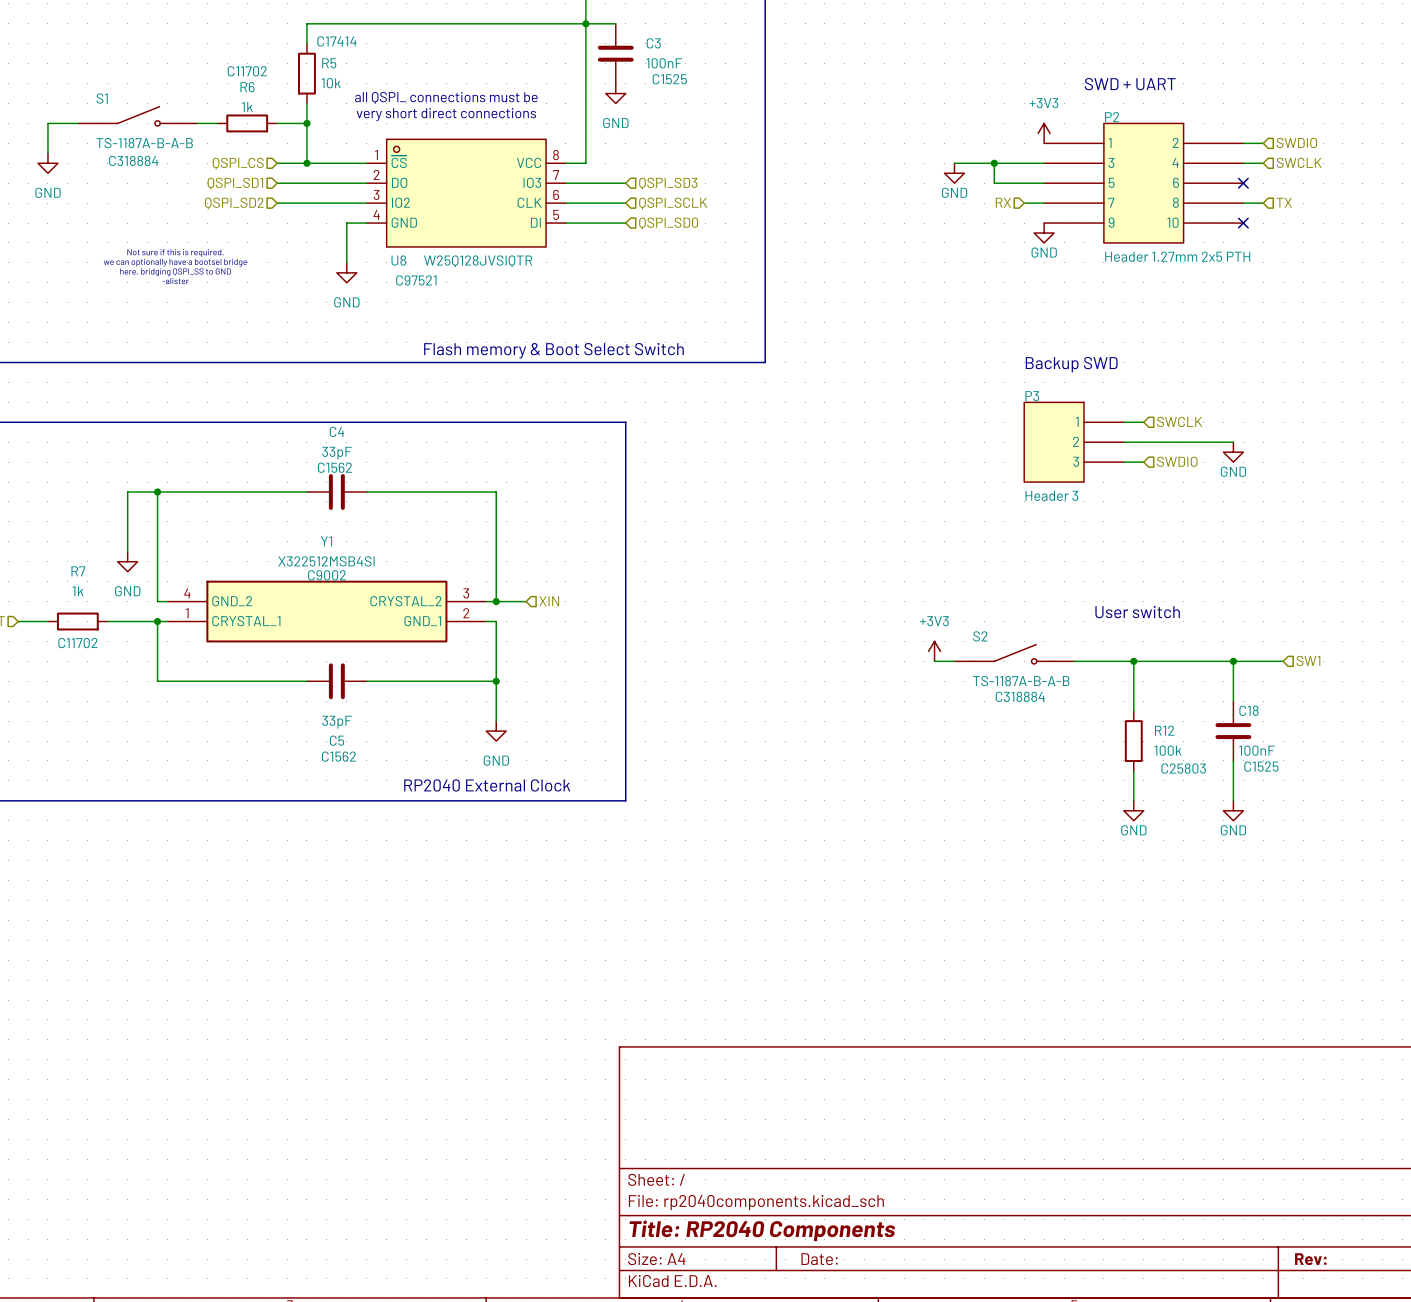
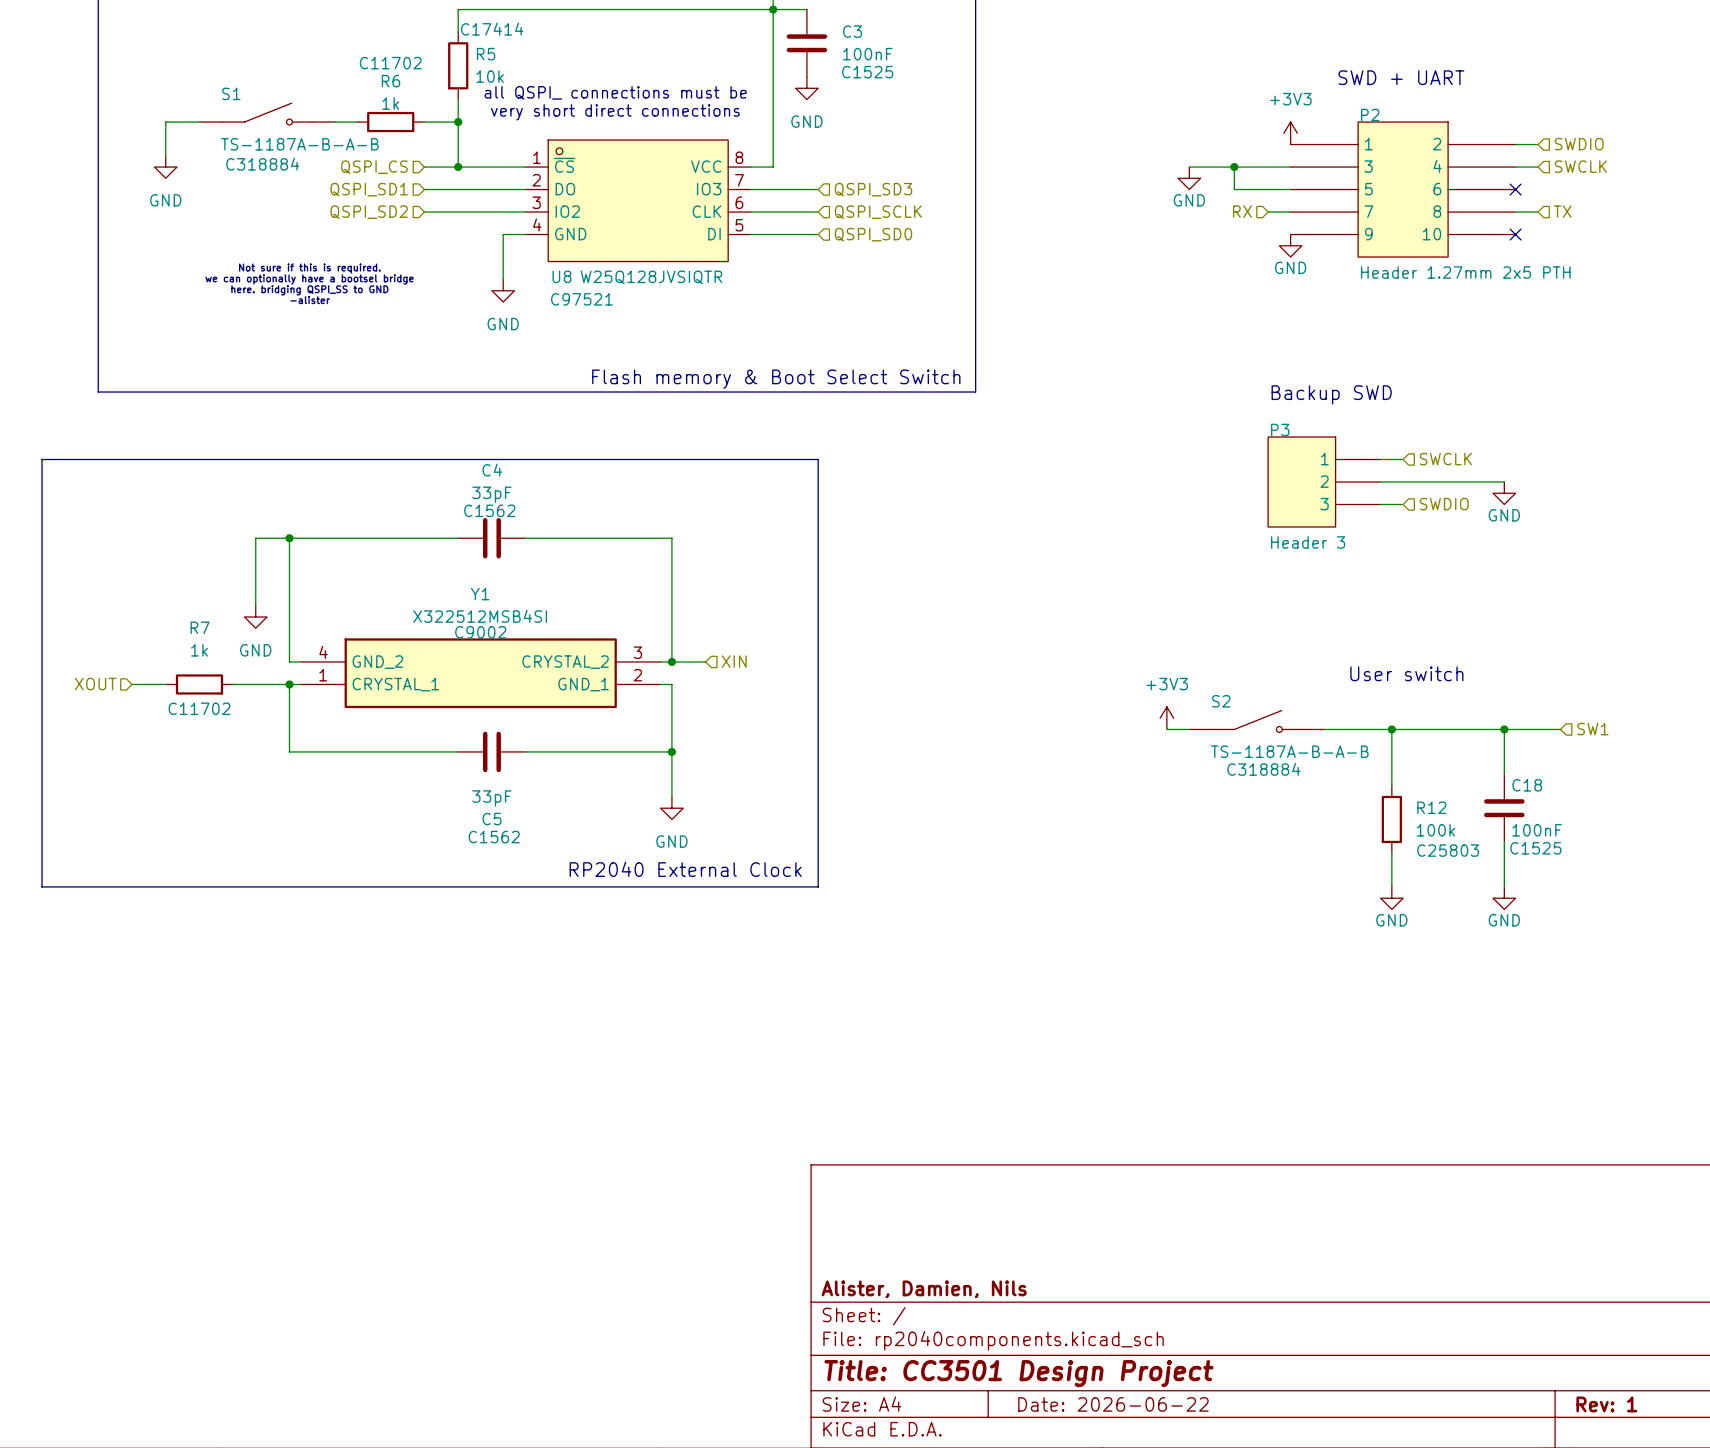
title block: none -> Alister, Damien, Nils (924, 1289)
title block: Title: RP2040 Components (762, 1230) -> Title: CC3501 Design Project (1018, 1373)
title block: Date: (819, 1259) -> Date: 2026-06-22 (1113, 1404)
title block: Rev: (1310, 1259) -> Rev: 1 (1606, 1404)

